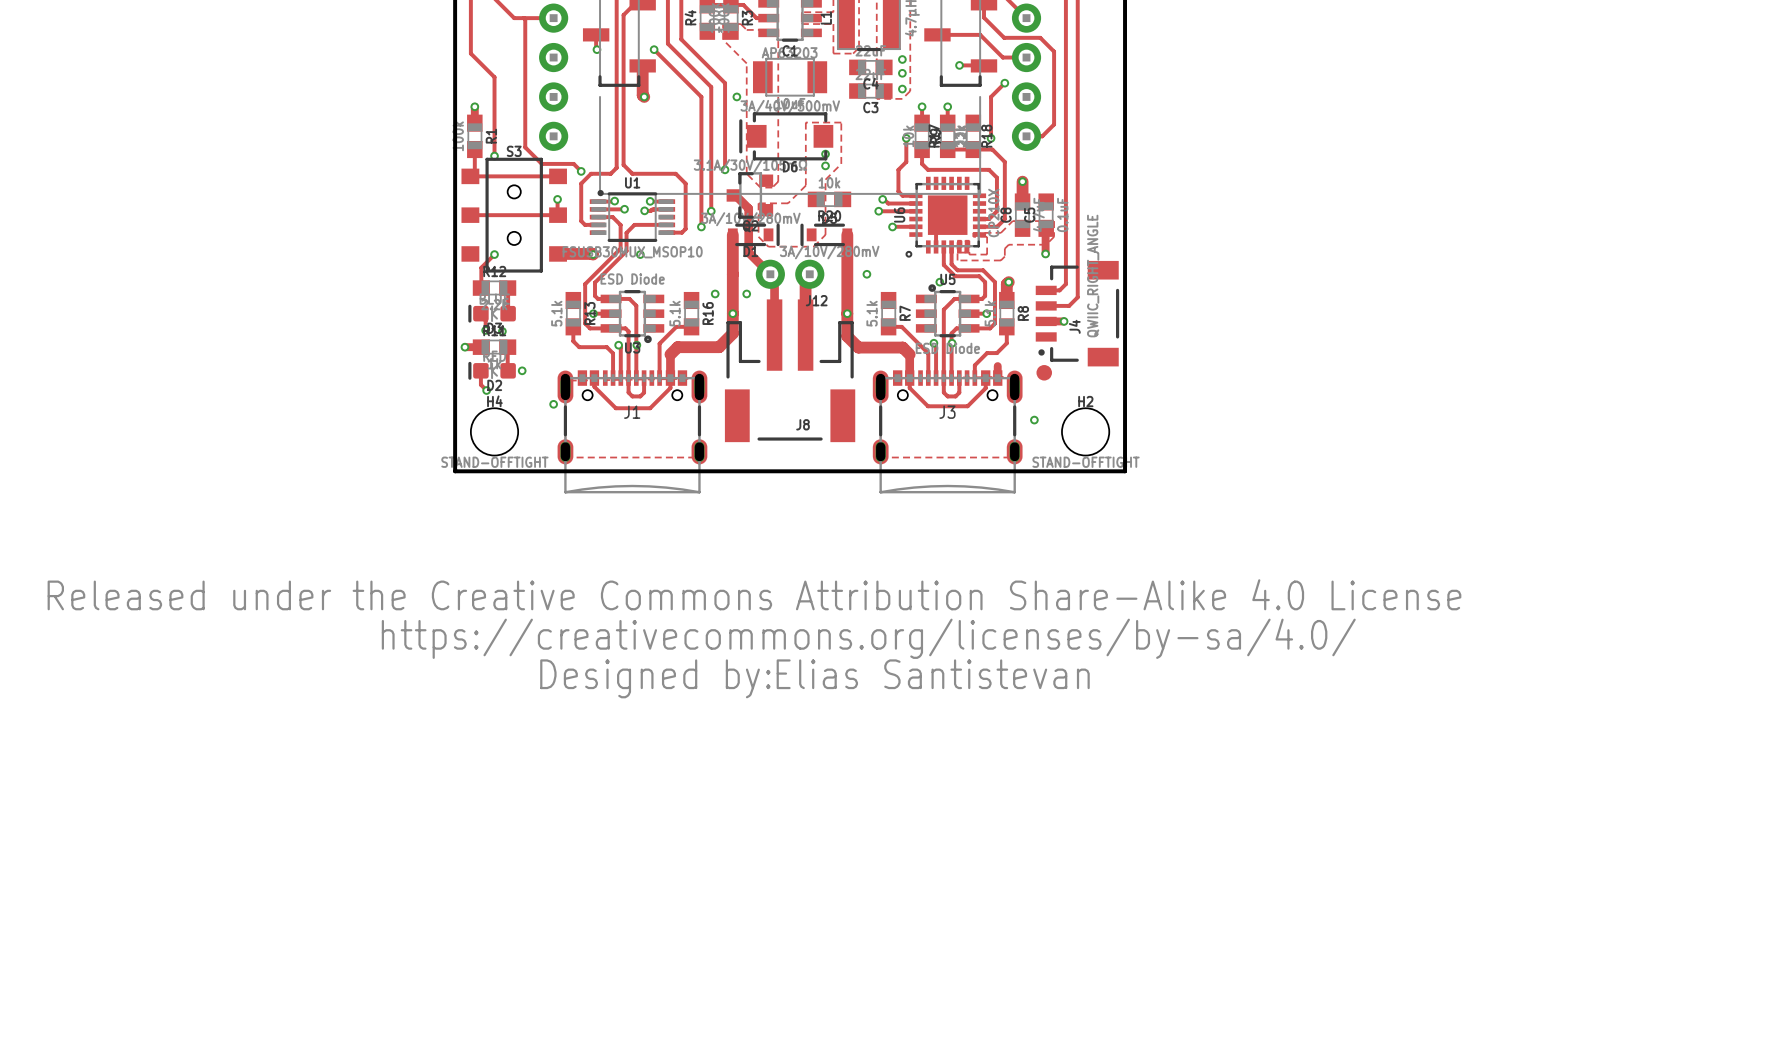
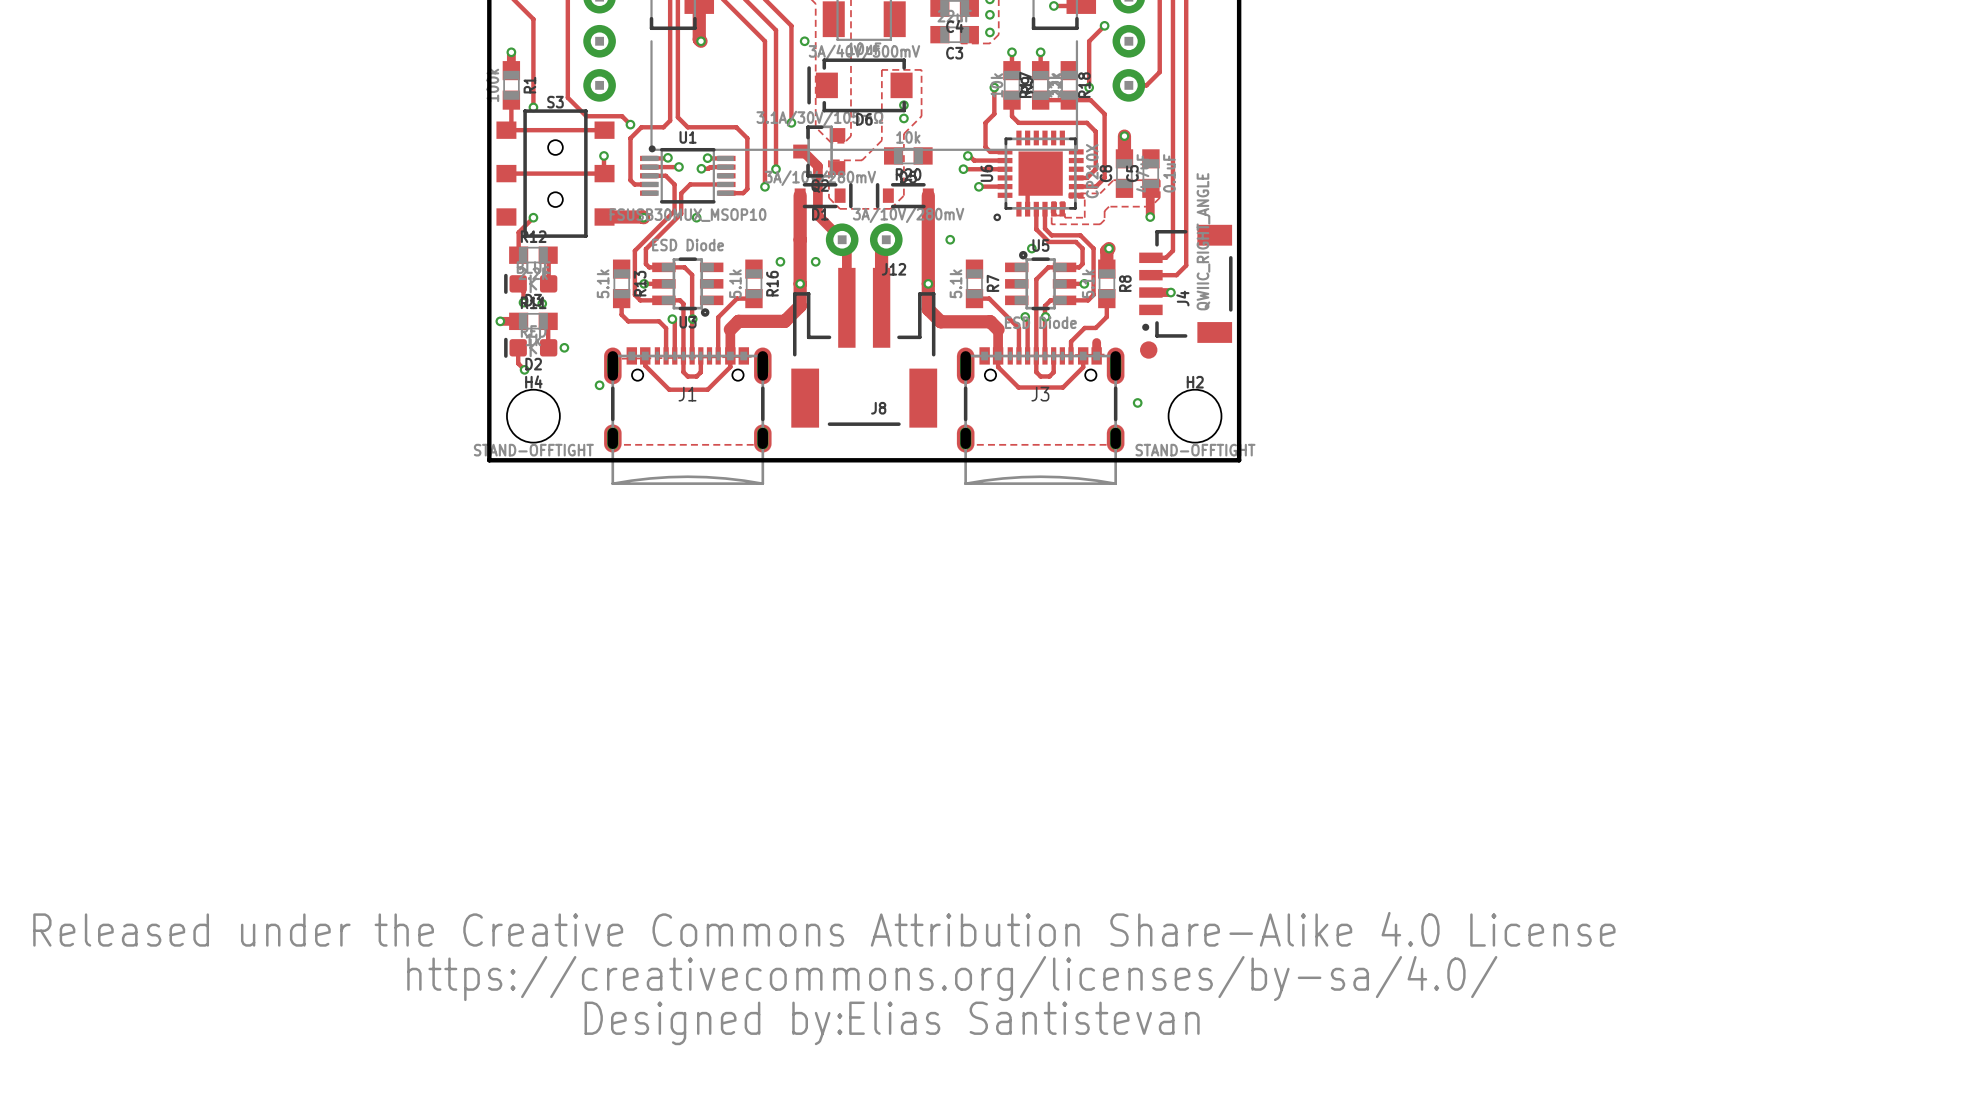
drawing position: (754, 638) -> (824, 978)
text position: Elias Santistevan (933, 674) -> Elias Santistevan (1024, 1018)

